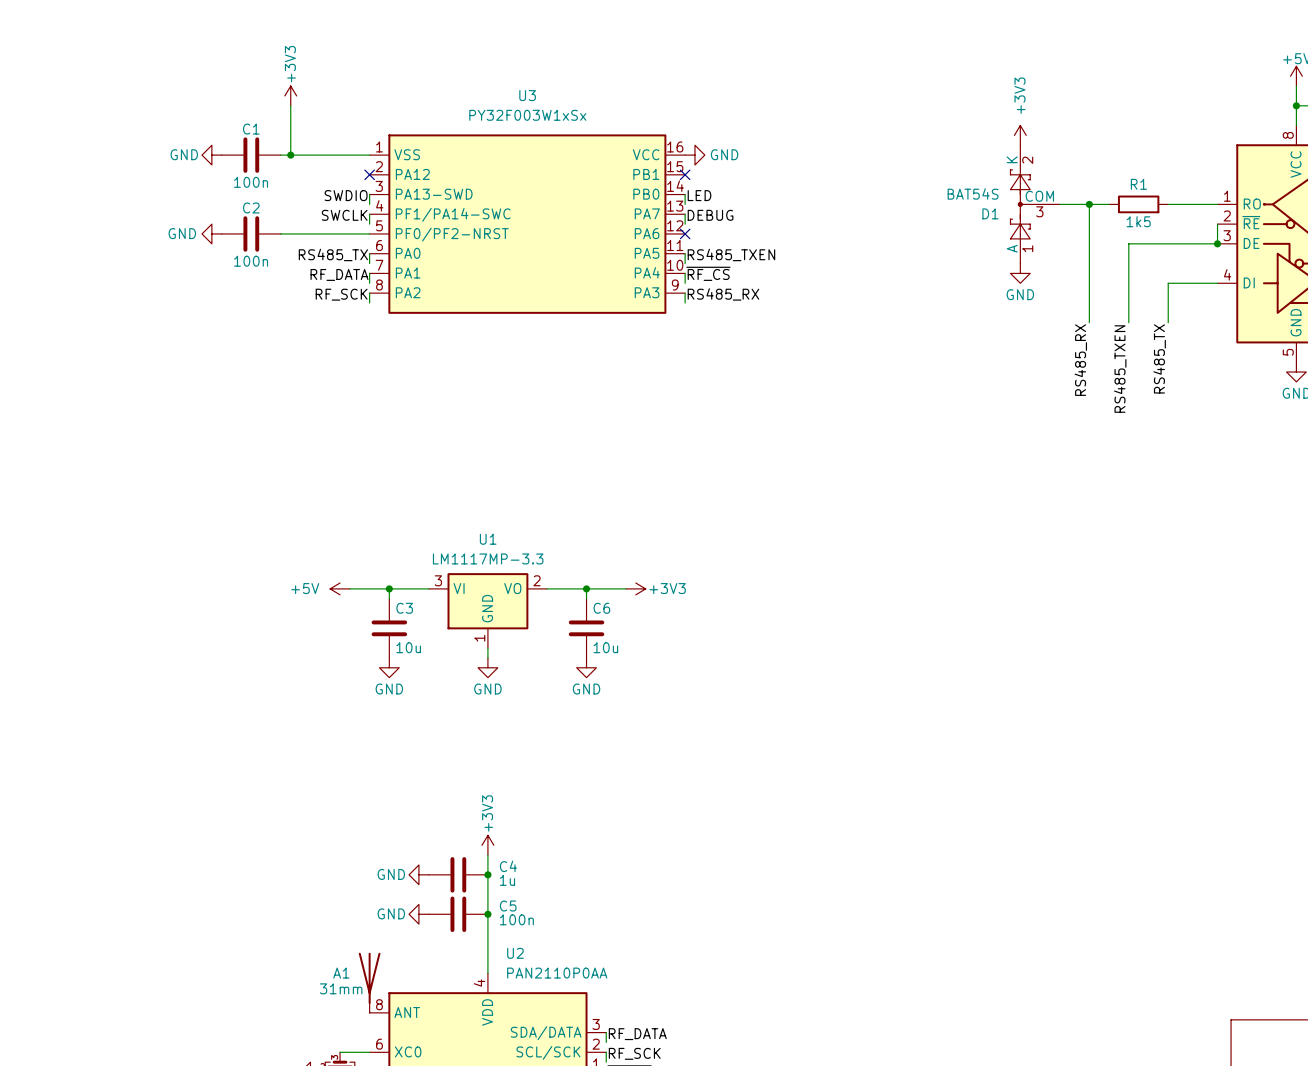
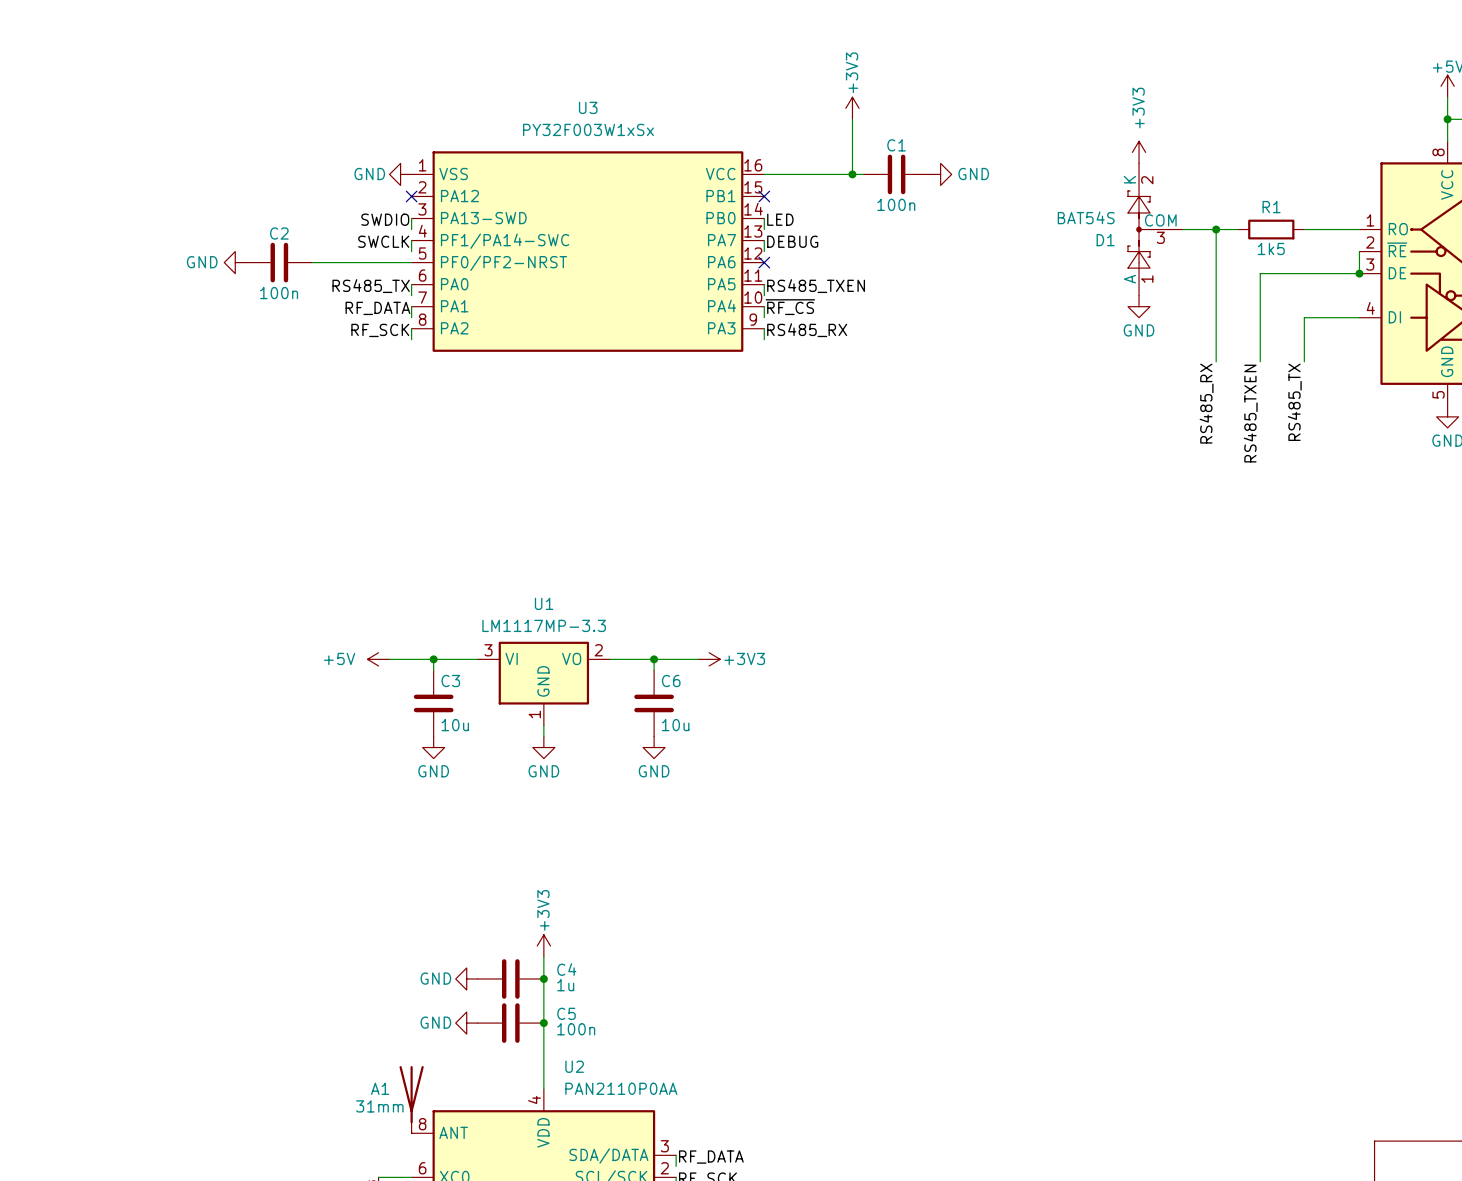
power symbol: +3V3 (290, 95) -> none
power symbol: none -> +3V3 (852, 108)
wire: (290, 105) (290, 155) -> none
wire: none -> (852, 119) (852, 174)
power symbol position: GND (211, 155) -> GND (400, 174)
C1 position: (251, 155) -> (896, 174)
wire: (280, 155) (369, 155) -> none
junction: (290, 155) -> none
wire: none -> (764, 174) (863, 174)
power symbol position: GND (694, 155) -> GND (940, 174)
junction: none -> (852, 174)

